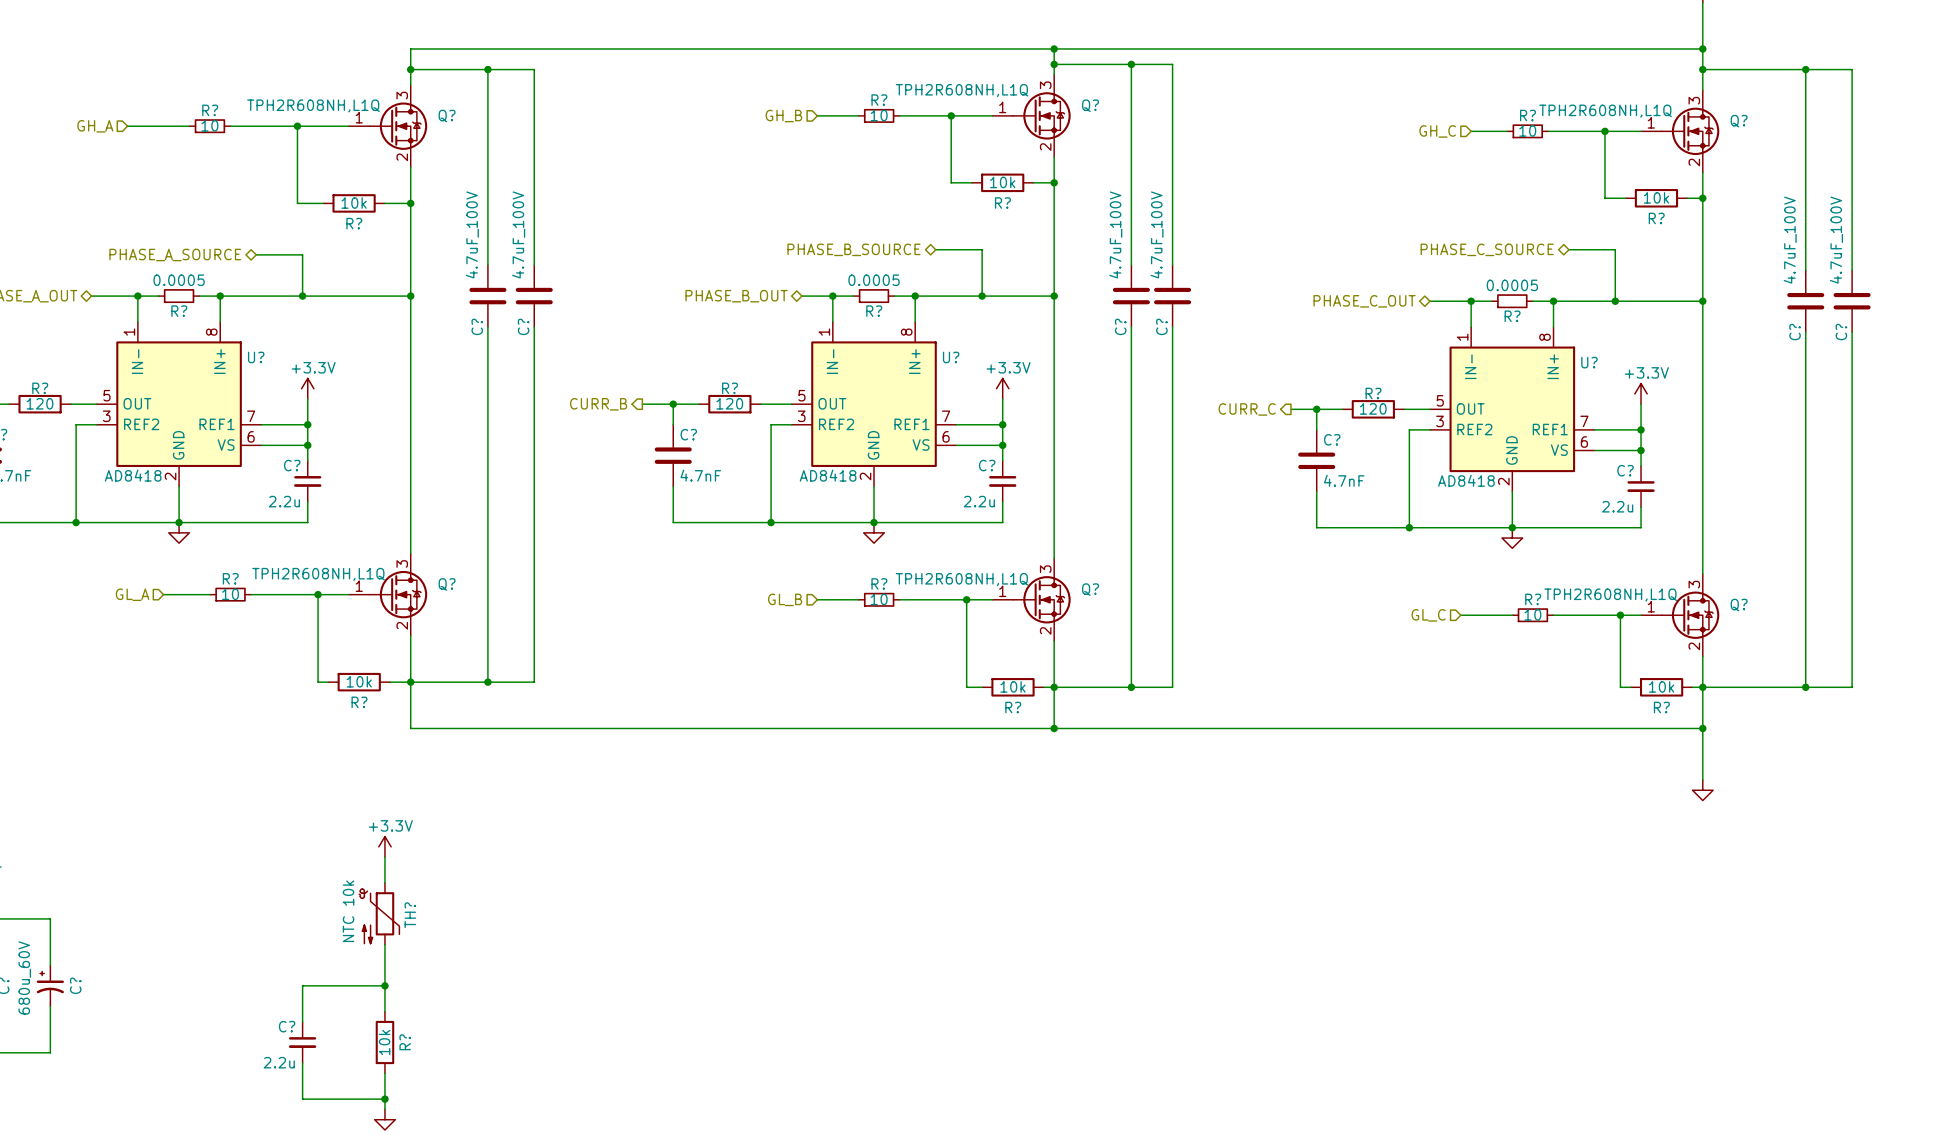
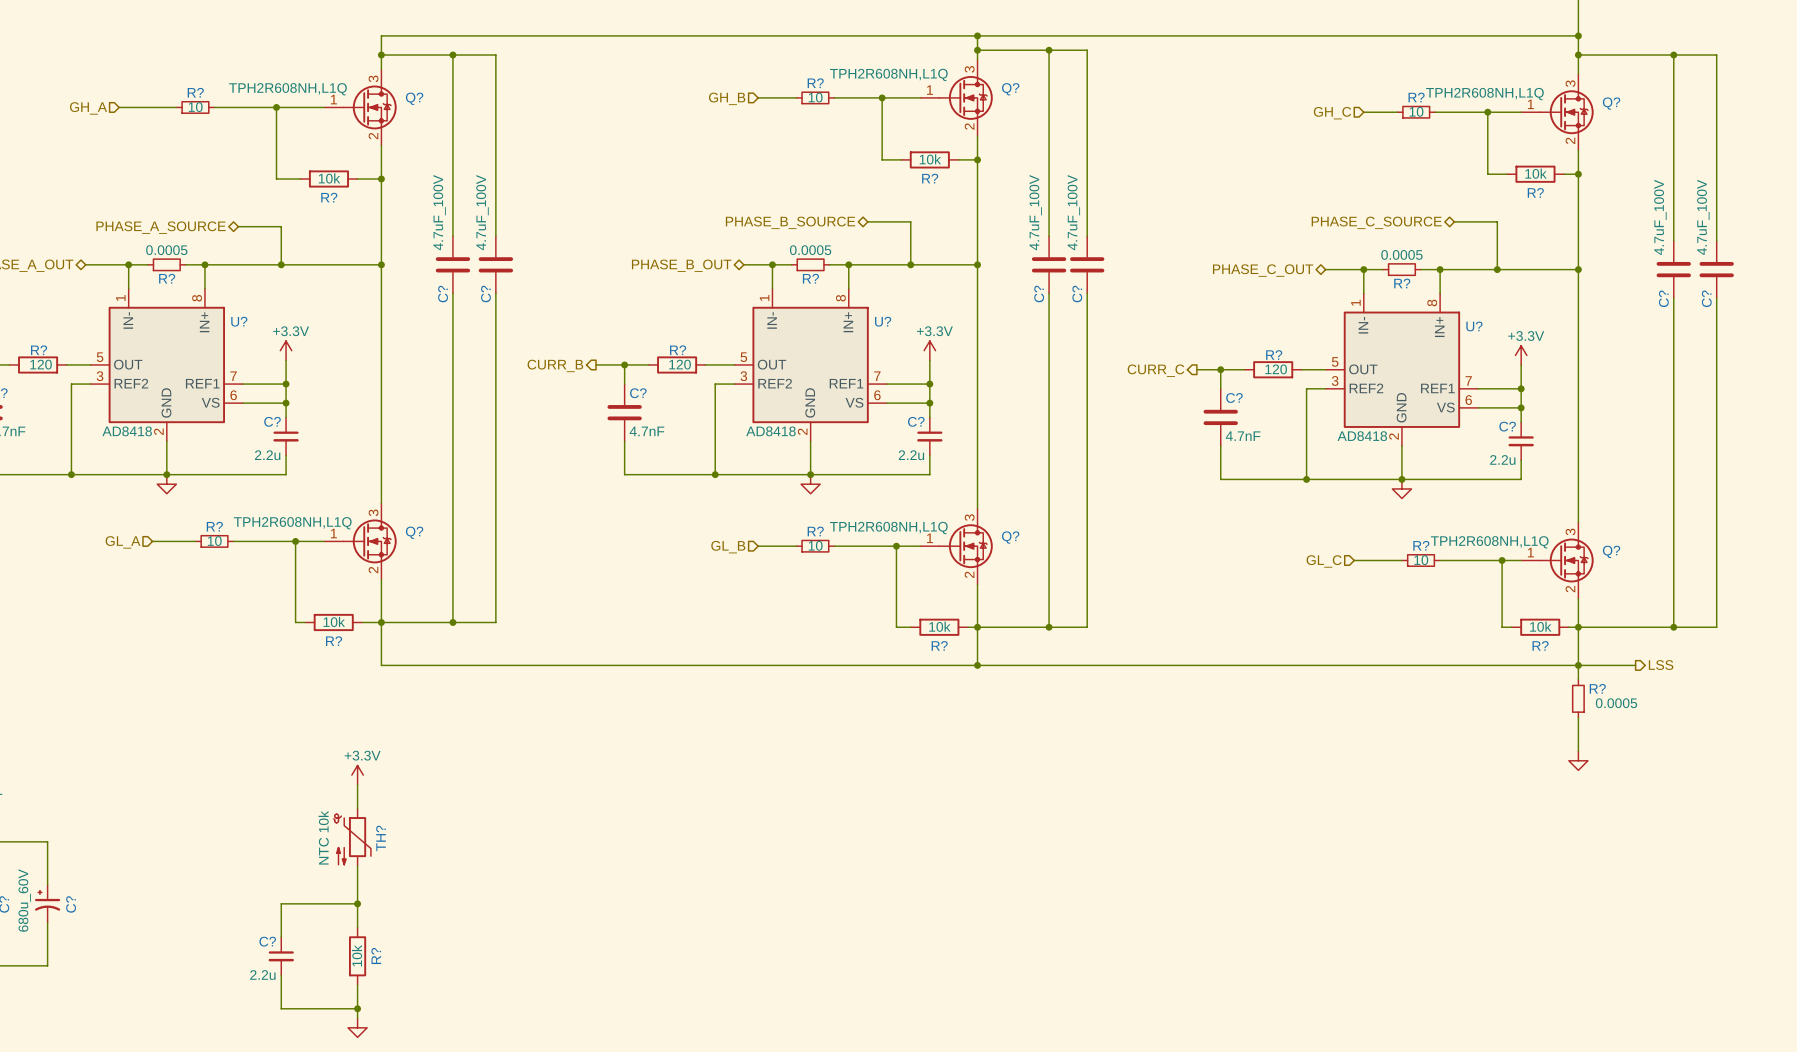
wire: none -> (1578, 665) (1635, 665)
hierarchical label: none -> LSS (1661, 665)
wire: (1702, 743) (1702, 779) -> (1578, 717) (1578, 751)
R?: none -> 0.0005 (1578, 698)
power symbol position: (1702, 790) -> (1578, 760)

